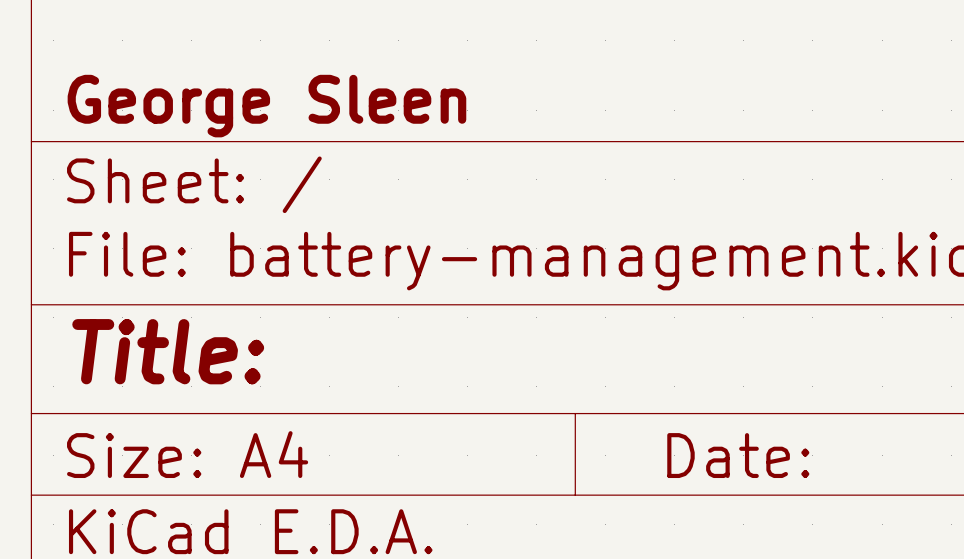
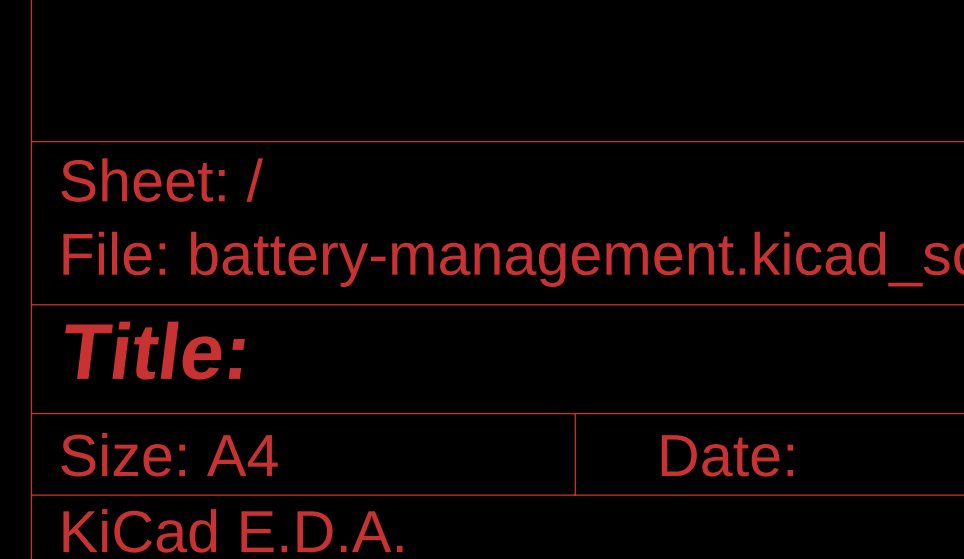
title block: George Sleen (266, 106) -> none

